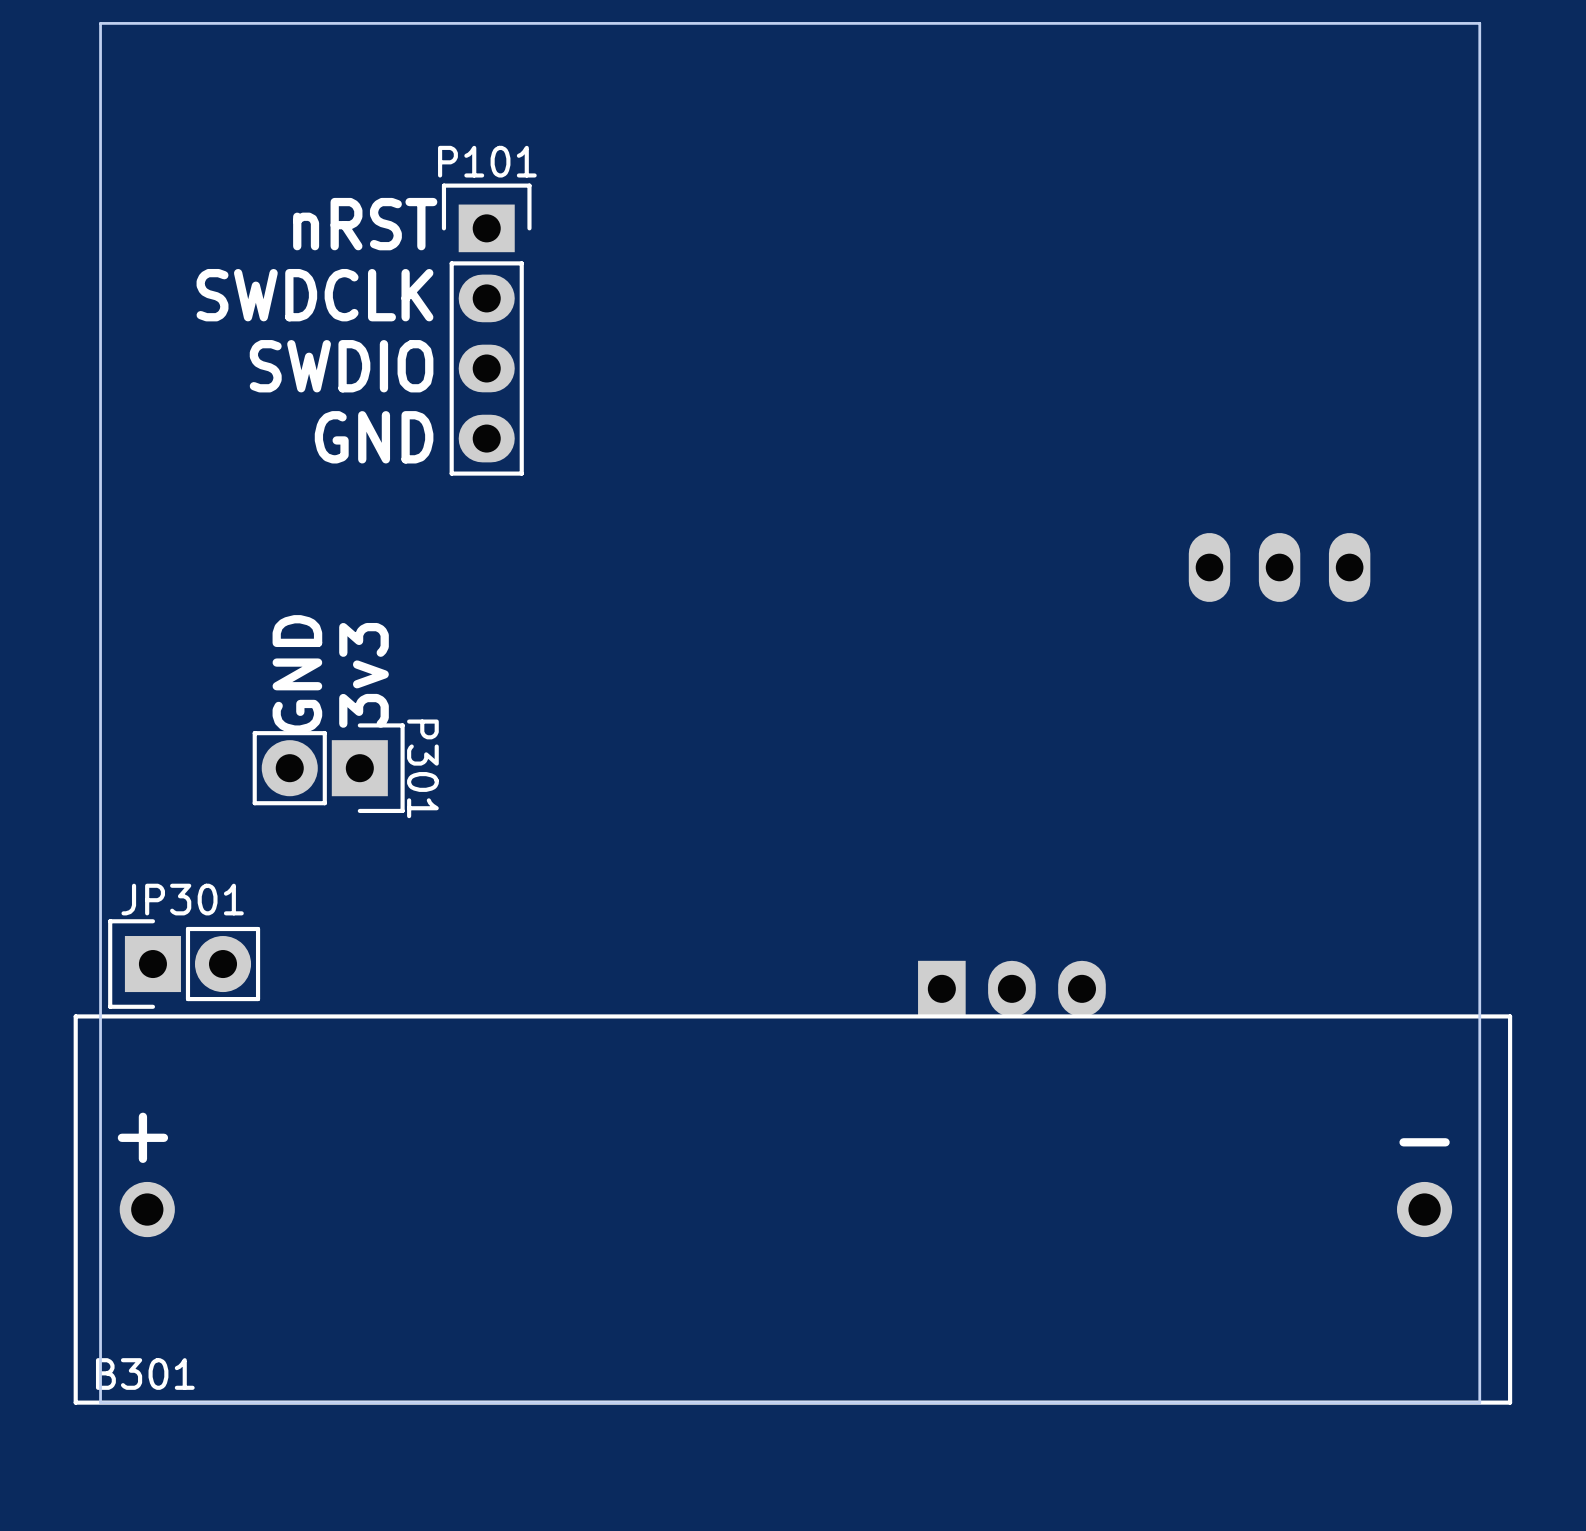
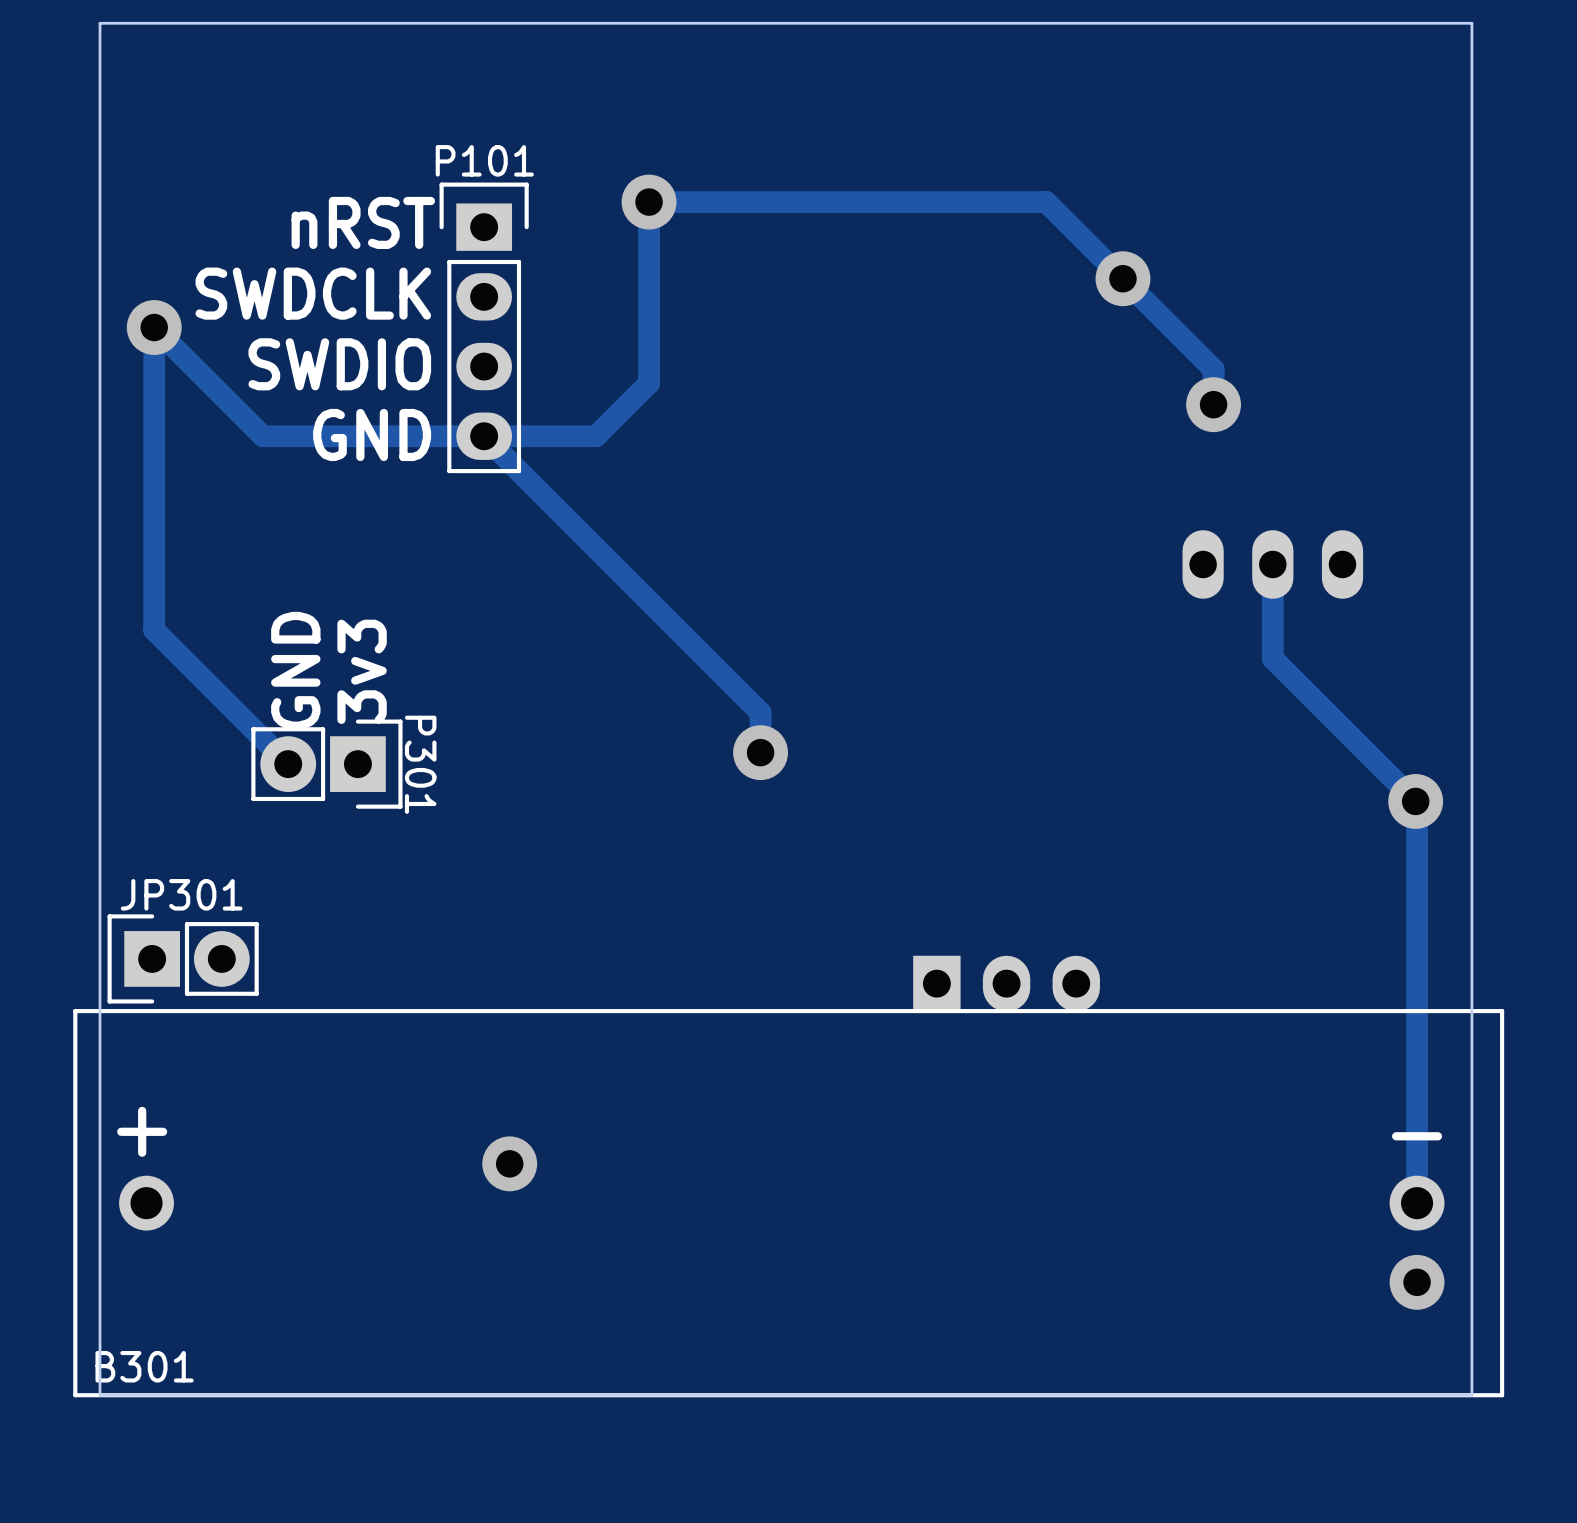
via: none -> (649, 202)
via: none -> (1122, 278)
via: none -> (154, 327)
track: none -> (1213, 404) (1213, 369) (1046, 202) (649, 202) (649, 383) (596, 436) (262, 436) (154, 327) (154, 630) (288, 764)
via: none -> (1213, 404)
track: none -> (484, 436) (760, 712) (760, 752)
track: none -> (1272, 564) (1272, 658) (1417, 802) (1417, 1203)
via: none -> (760, 752)
via: none -> (1415, 801)
via: none -> (509, 1163)
via: none -> (1417, 1282)

